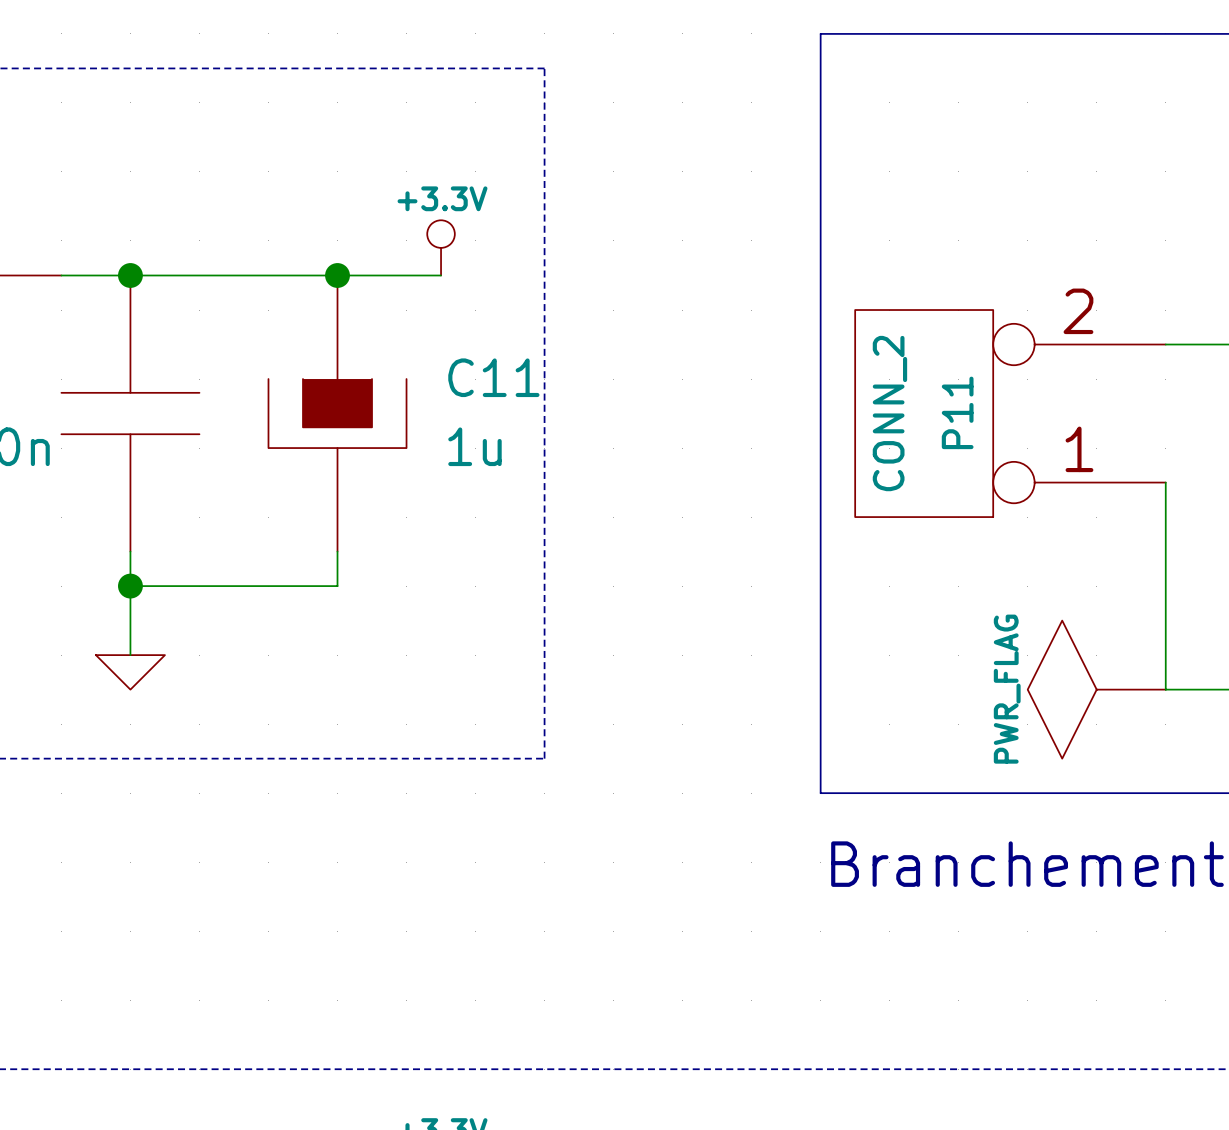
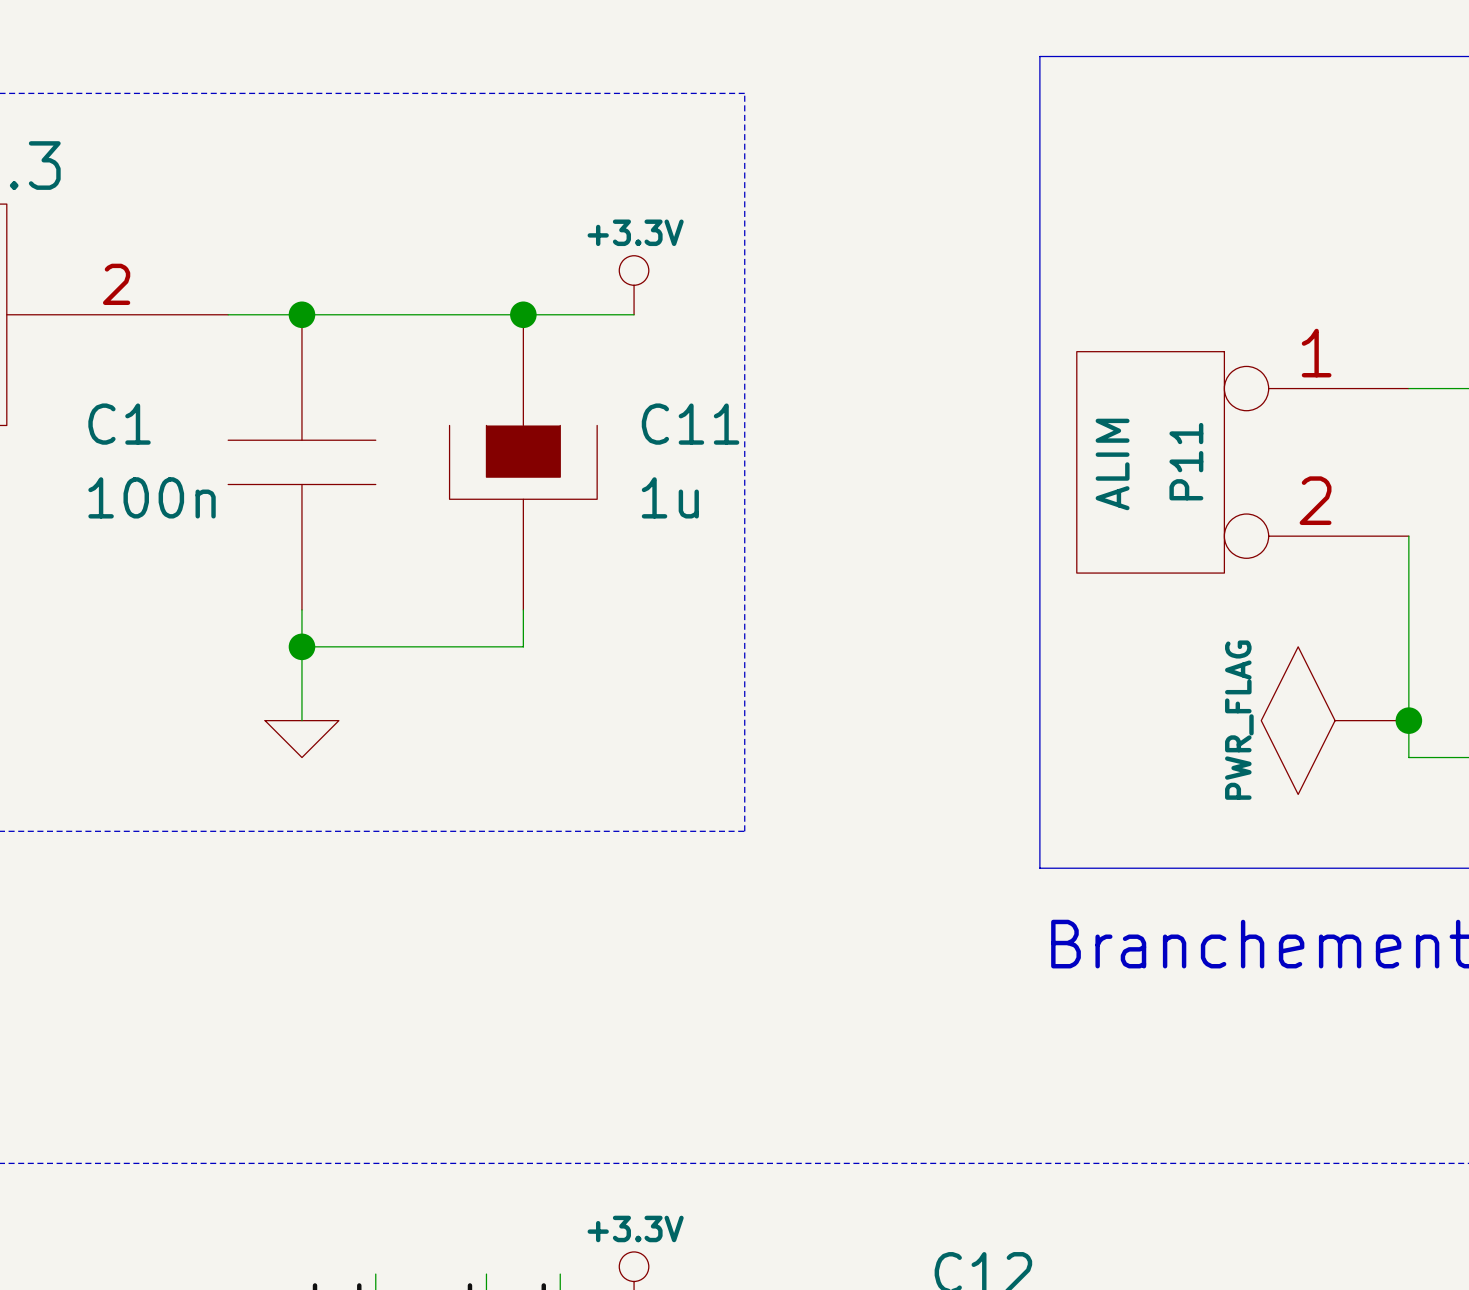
P11 value: CONN_2 (889, 413) -> ALIM (1112, 464)
P11 flip: as is (924, 413) -> up-down (1150, 462)
junction: none -> (1408, 720)
power symbol position: PWR_FLAG (1096, 689) -> PWR_FLAG (1335, 720)

